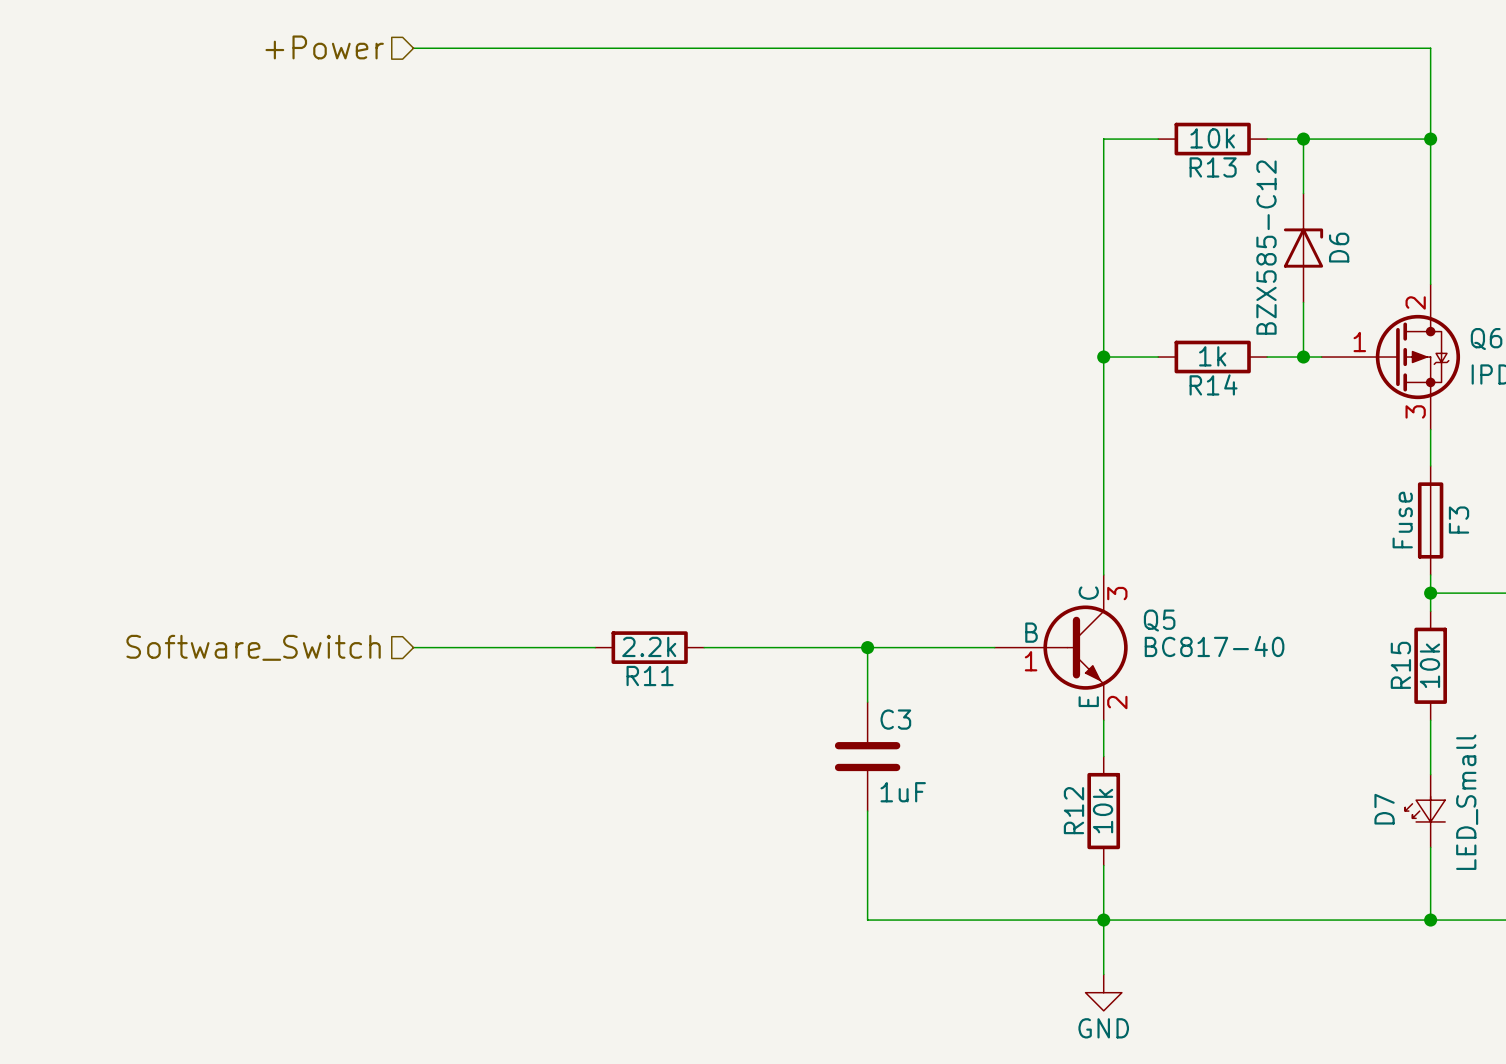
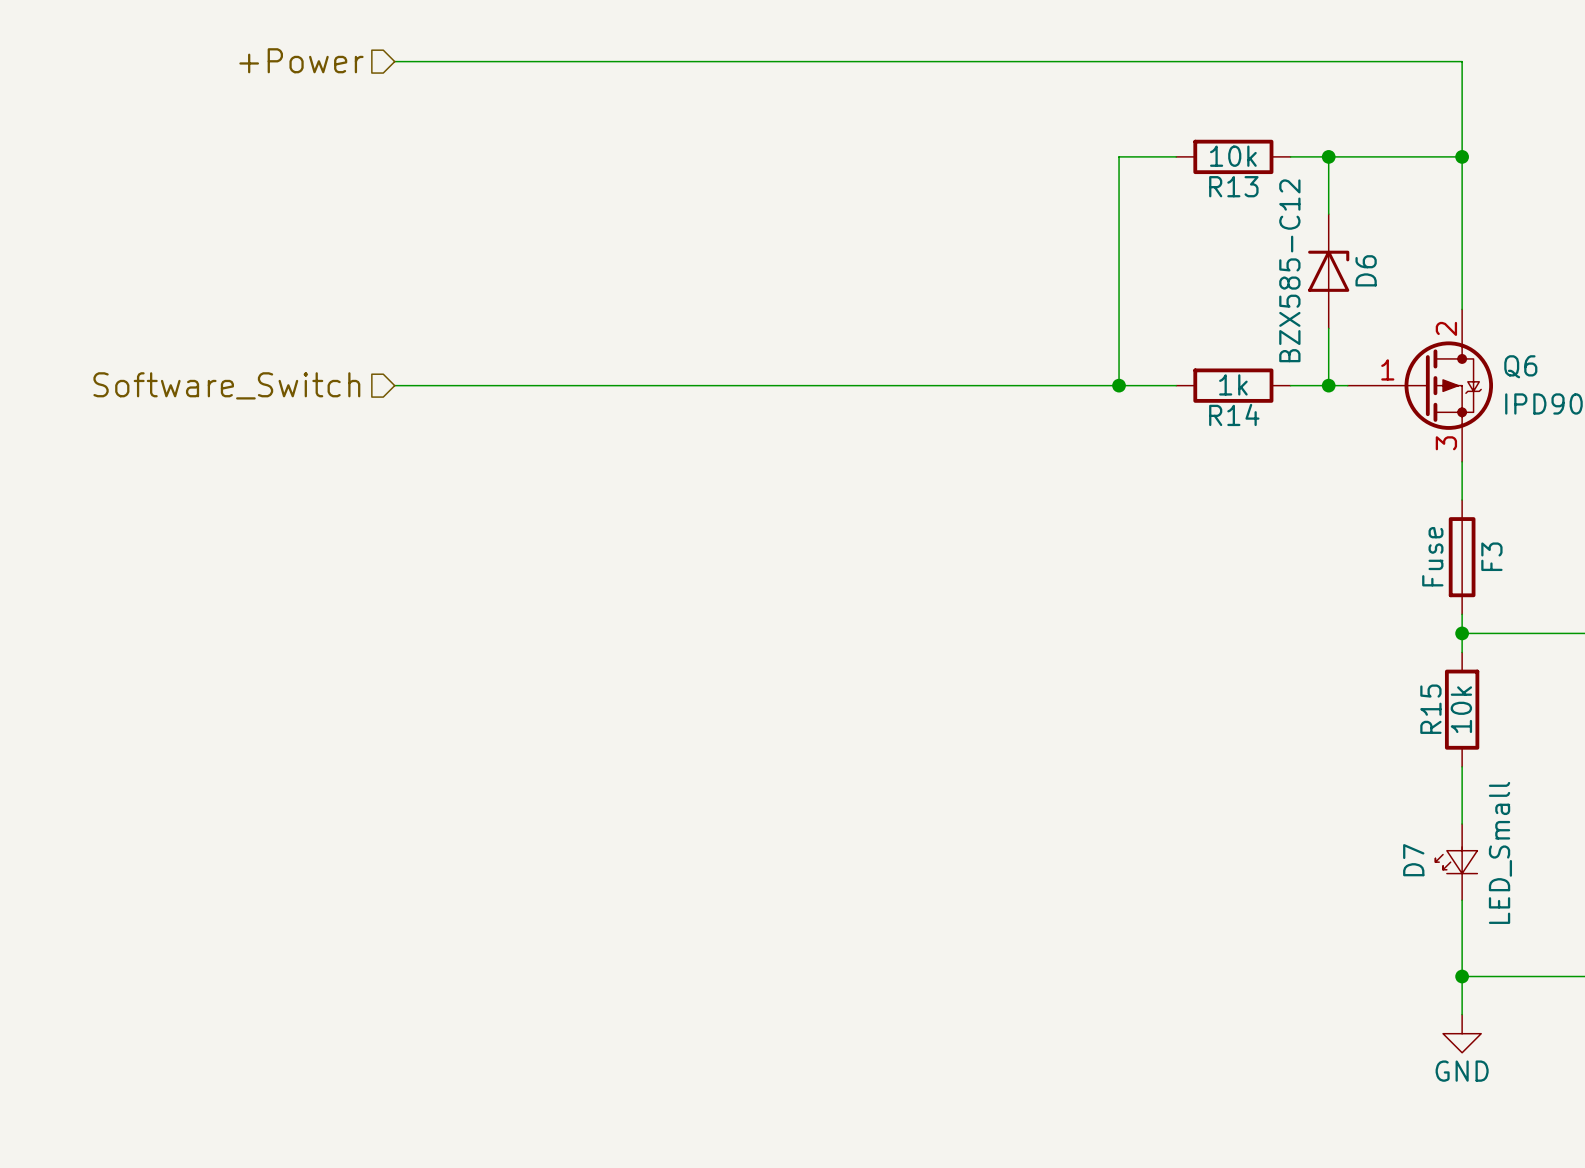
wire: (1103, 357) (1103, 574) -> (1119, 385) (394, 385)
hierarchical label position: Software_Switch (253, 647) -> Software_Switch (226, 385)
wire: (413, 647) (595, 647) -> none
R11: 2.2k (649, 647) -> none
wire: (704, 647) (994, 647) -> none
wire: (867, 647) (867, 702) -> none
junction: (867, 647) -> none
Q5: BC817-40 (1061, 647) -> none
wire: (1103, 720) (1103, 756) -> none
C3: 1uF (867, 756) -> none
wire: (867, 811) (867, 920) (1430, 920) -> (1462, 1014) (1462, 976)
R12: 10k (1103, 811) -> none
wire: (1103, 865) (1103, 974) -> none
junction: (1103, 920) -> none
power symbol position: GND (1103, 992) -> GND (1462, 1033)

